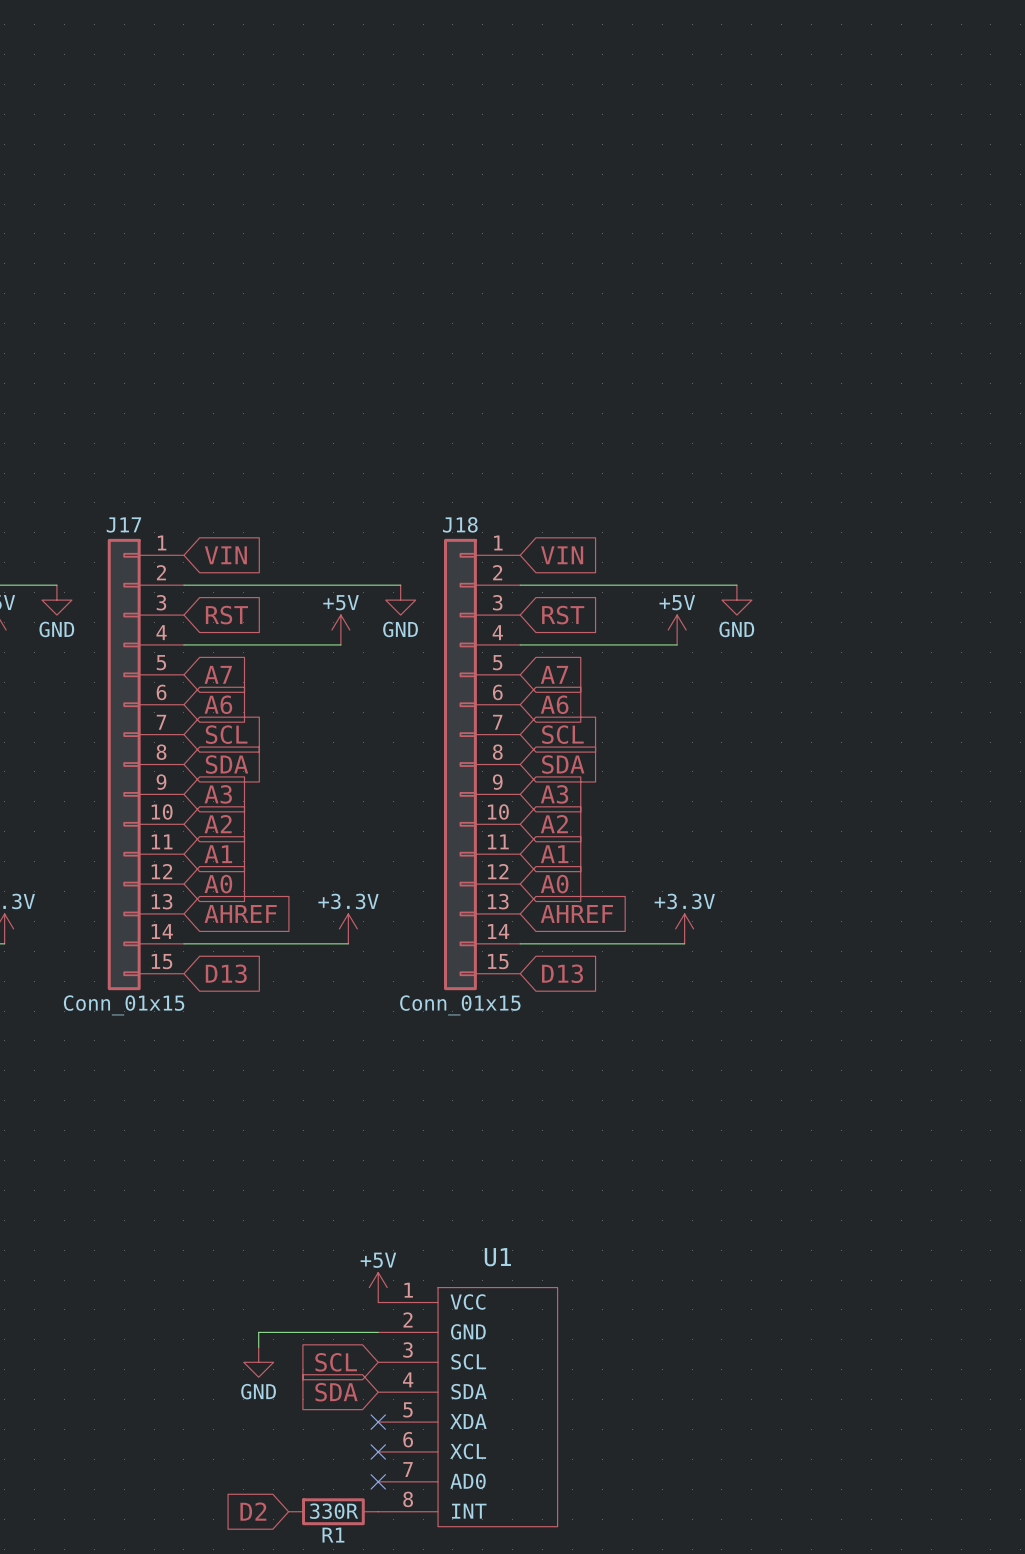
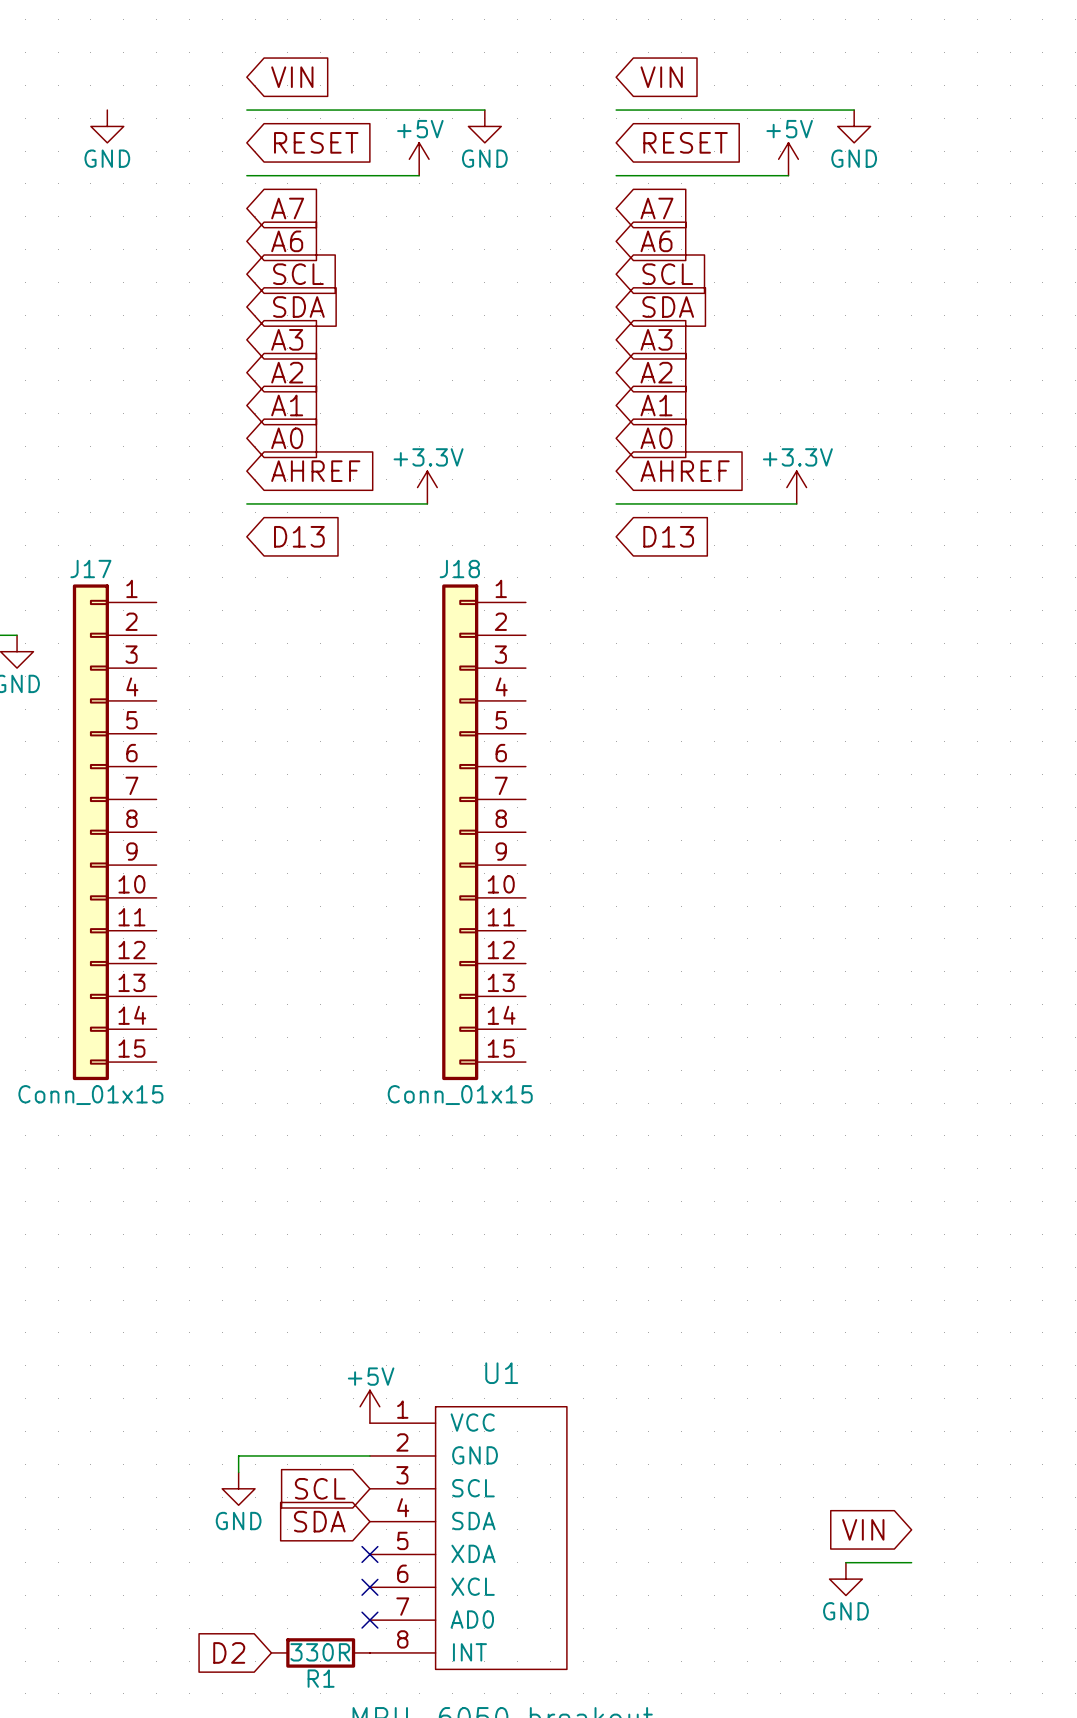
global label: none -> VIN (292, 77)
global label: none -> VIN (661, 77)
wire: none -> (246, 110) (484, 110)
wire: none -> (616, 110) (854, 110)
power symbol: none -> GND (107, 126)
power symbol: none -> GND (484, 126)
power symbol: none -> GND (854, 126)
global label: none -> RESET (316, 142)
global label: none -> RESET (685, 142)
power symbol: none -> +5V (419, 159)
power symbol: none -> +5V (788, 159)
wire: none -> (246, 175) (419, 175)
wire: none -> (616, 175) (788, 175)
global label: none -> A7 (287, 208)
global label: none -> A7 (656, 208)
global label: none -> A6 (287, 241)
global label: none -> A6 (656, 241)
global label: none -> SCL (298, 274)
global label: none -> SCL (667, 274)
global label: none -> SDA (298, 307)
global label: none -> SDA (668, 307)
global label: none -> A3 (287, 339)
global label: none -> A3 (656, 339)
global label: none -> A2 (287, 372)
global label: none -> A2 (656, 372)
global label: none -> A1 (287, 405)
global label: none -> A1 (656, 405)
global label: none -> A0 (287, 438)
global label: none -> A0 (656, 438)
global label: none -> AHREF (315, 471)
global label: none -> AHREF (685, 471)
power symbol: none -> +3.3V (427, 487)
power symbol: none -> +3.3V (796, 487)
wire: none -> (246, 503) (427, 503)
wire: none -> (616, 503) (796, 503)
global label: none -> D13 (299, 536)
global label: none -> D13 (668, 536)
global label: VIN (225, 555) -> none
global label: VIN (562, 555) -> none
wire: (183, 585) (400, 585) -> none
wire: (520, 585) (736, 585) -> none
power symbol: GND (400, 600) -> none
power symbol: GND (736, 600) -> none
global label: RST (226, 615) -> none
global label: RST (563, 615) -> none
power symbol: +5V (340, 630) -> none
power symbol: +5V (677, 630) -> none
wire: (183, 644) (340, 644) -> none
wire: (520, 644) (677, 644) -> none
global label: A7 (218, 674) -> none
global label: A7 (554, 674) -> none
global label: A6 (218, 704) -> none
global label: A6 (554, 704) -> none
global label: SCL (226, 734) -> none
global label: SCL (562, 734) -> none
global label: SDA (226, 764) -> none
global label: SDA (563, 764) -> none
global label: A3 (218, 794) -> none
global label: A3 (554, 794) -> none
global label: A2 (218, 824) -> none
global label: A2 (554, 824) -> none
global label: A1 (218, 854) -> none
global label: A1 (554, 854) -> none
global label: A0 (218, 884) -> none
global label: A0 (554, 884) -> none
global label: AHREF (240, 913) -> none
global label: AHREF (576, 913) -> none
power symbol: +3.3V (348, 928) -> none
power symbol: +3.3V (684, 928) -> none
wire: (183, 943) (348, 943) -> none
wire: (520, 943) (684, 943) -> none
global label: D13 (226, 973) -> none
global label: D13 (562, 973) -> none
global label: none -> VIN (863, 1529)
wire: none -> (845, 1562) (911, 1562)
power symbol: none -> GND (845, 1579)

